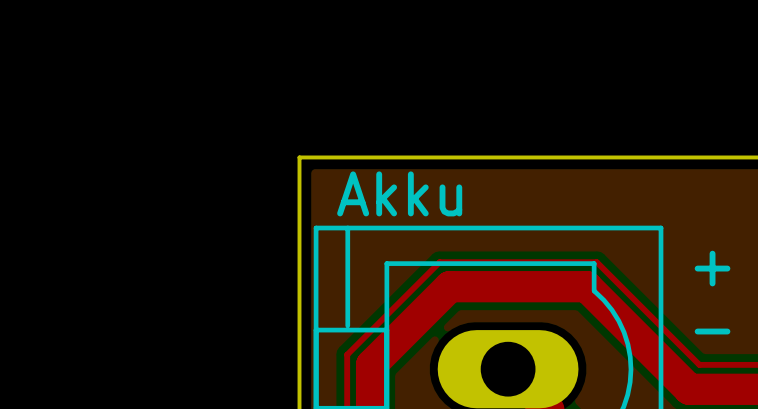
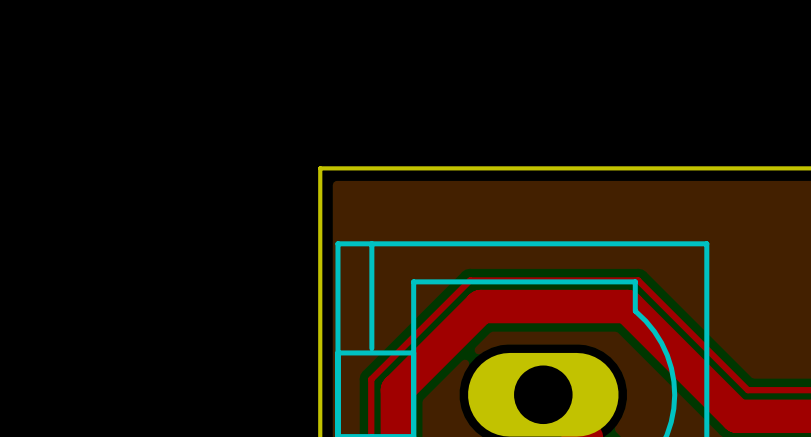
text: Akku (399, 193) -> none
text: + (712, 268) -> none
text: - (712, 331) -> none

